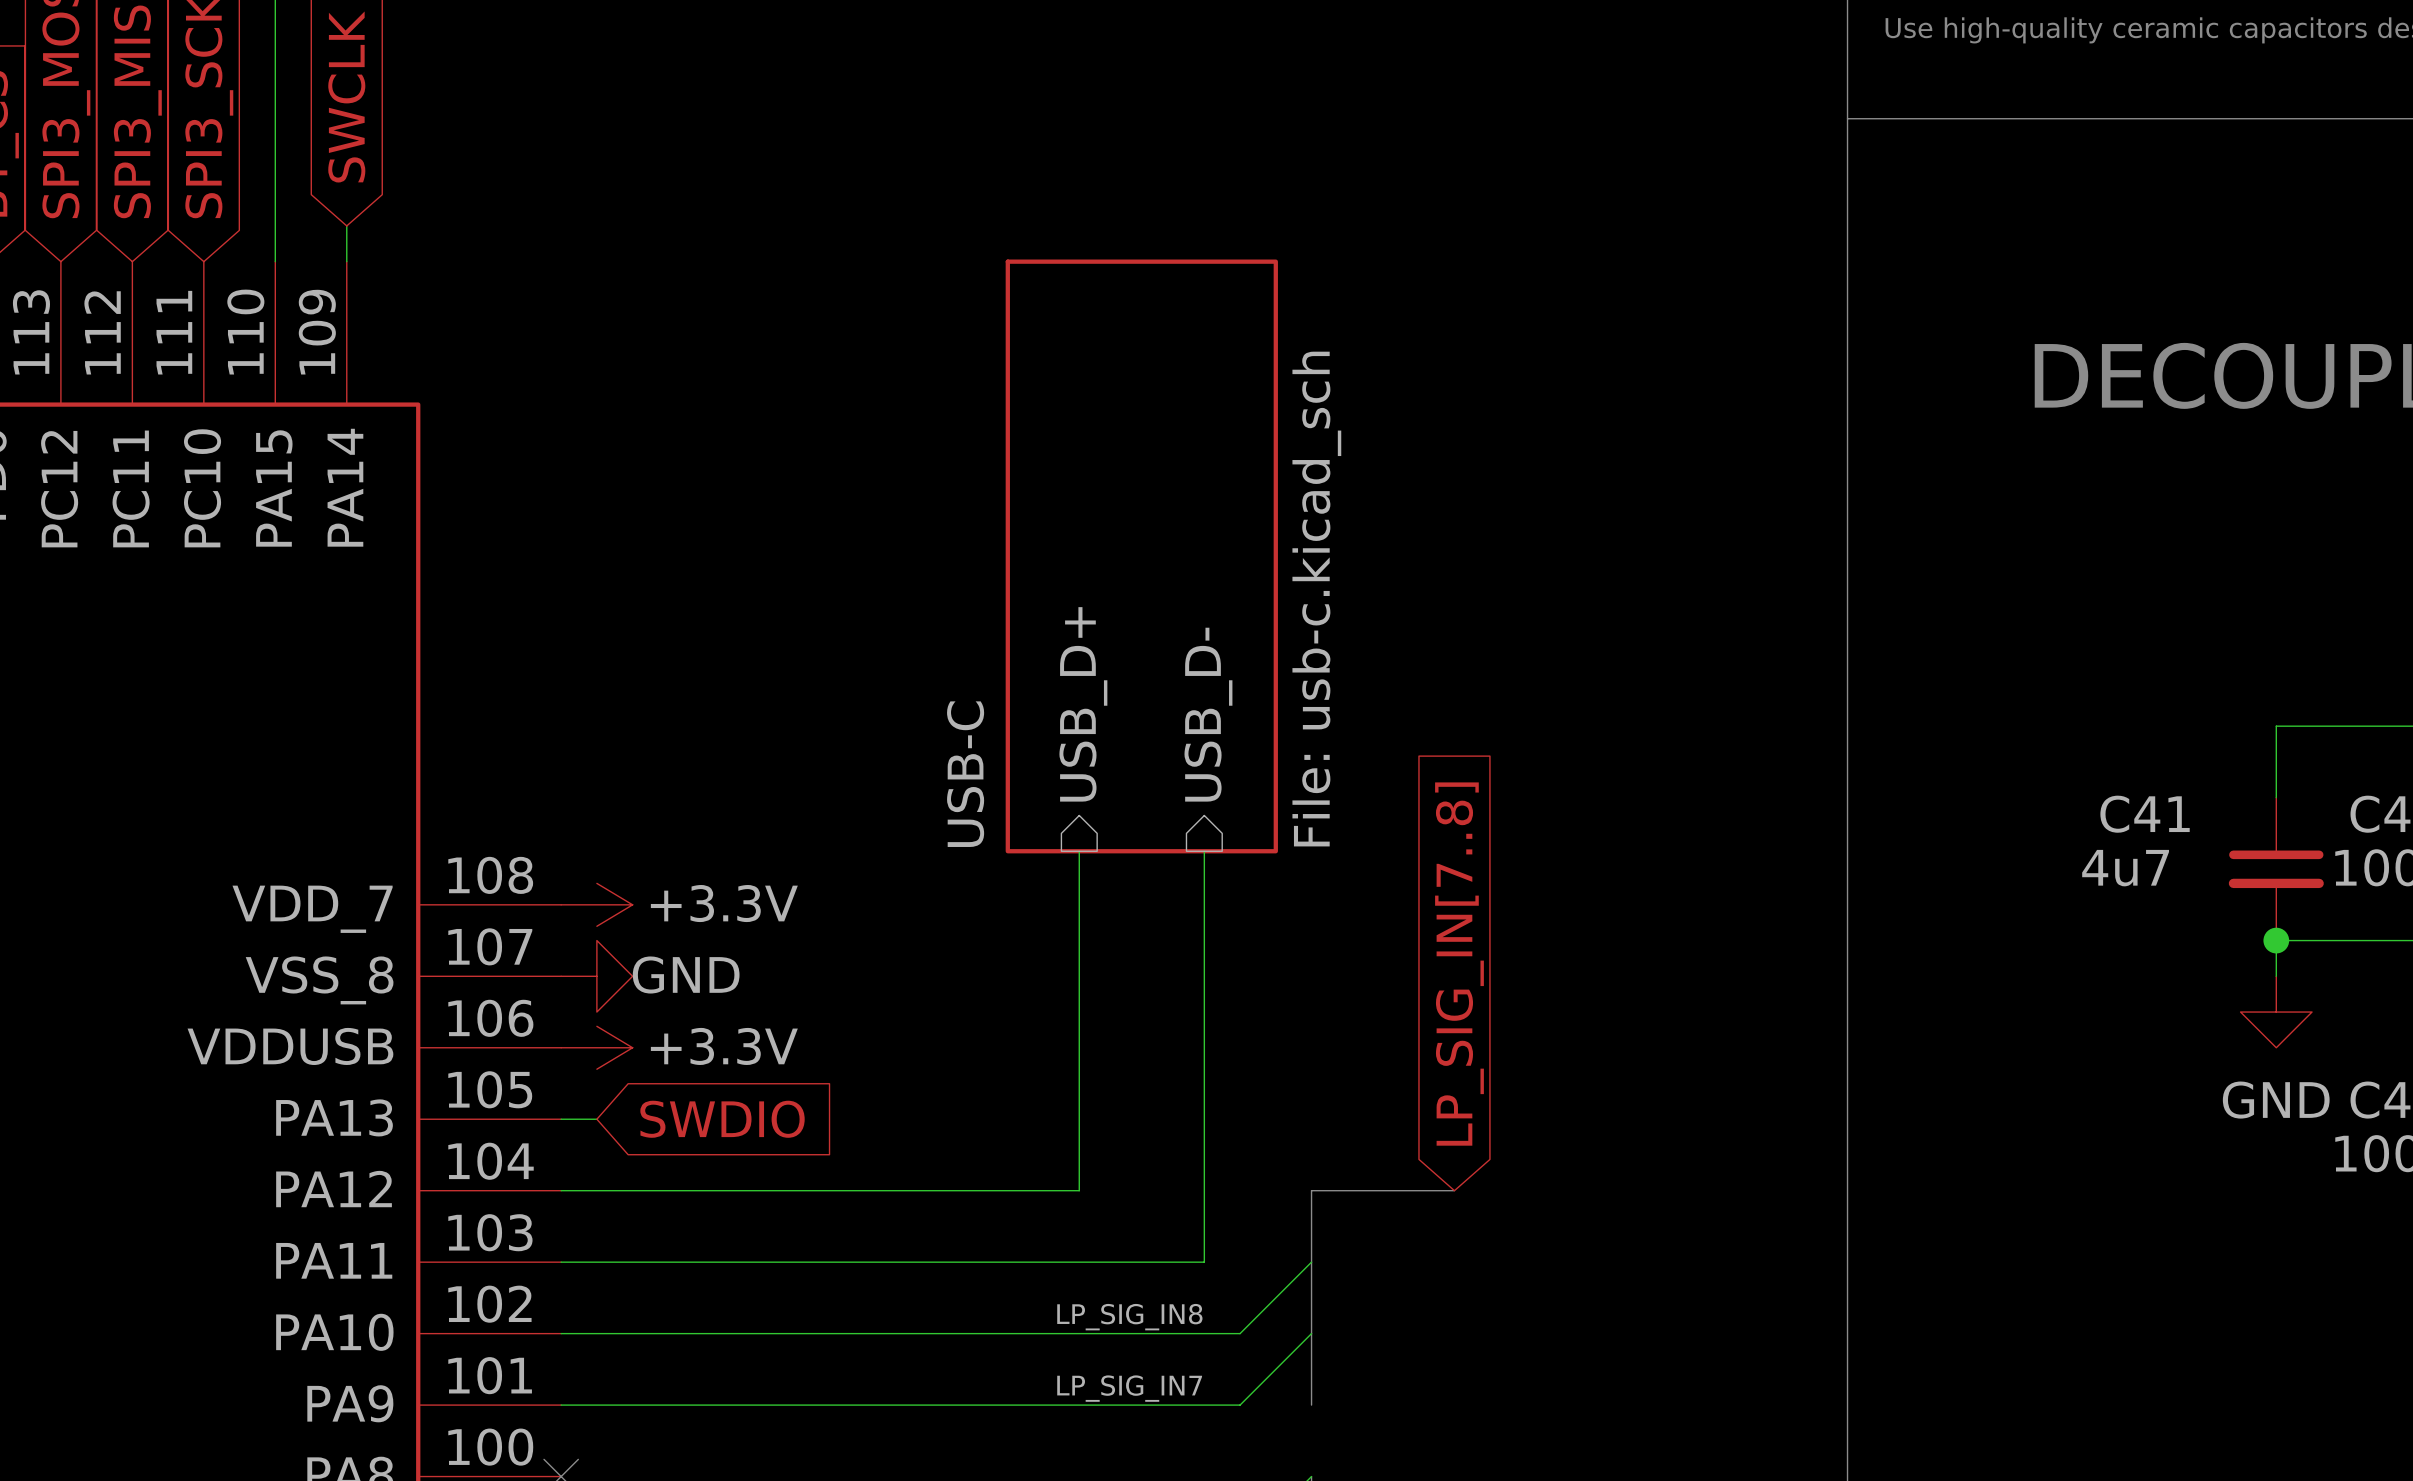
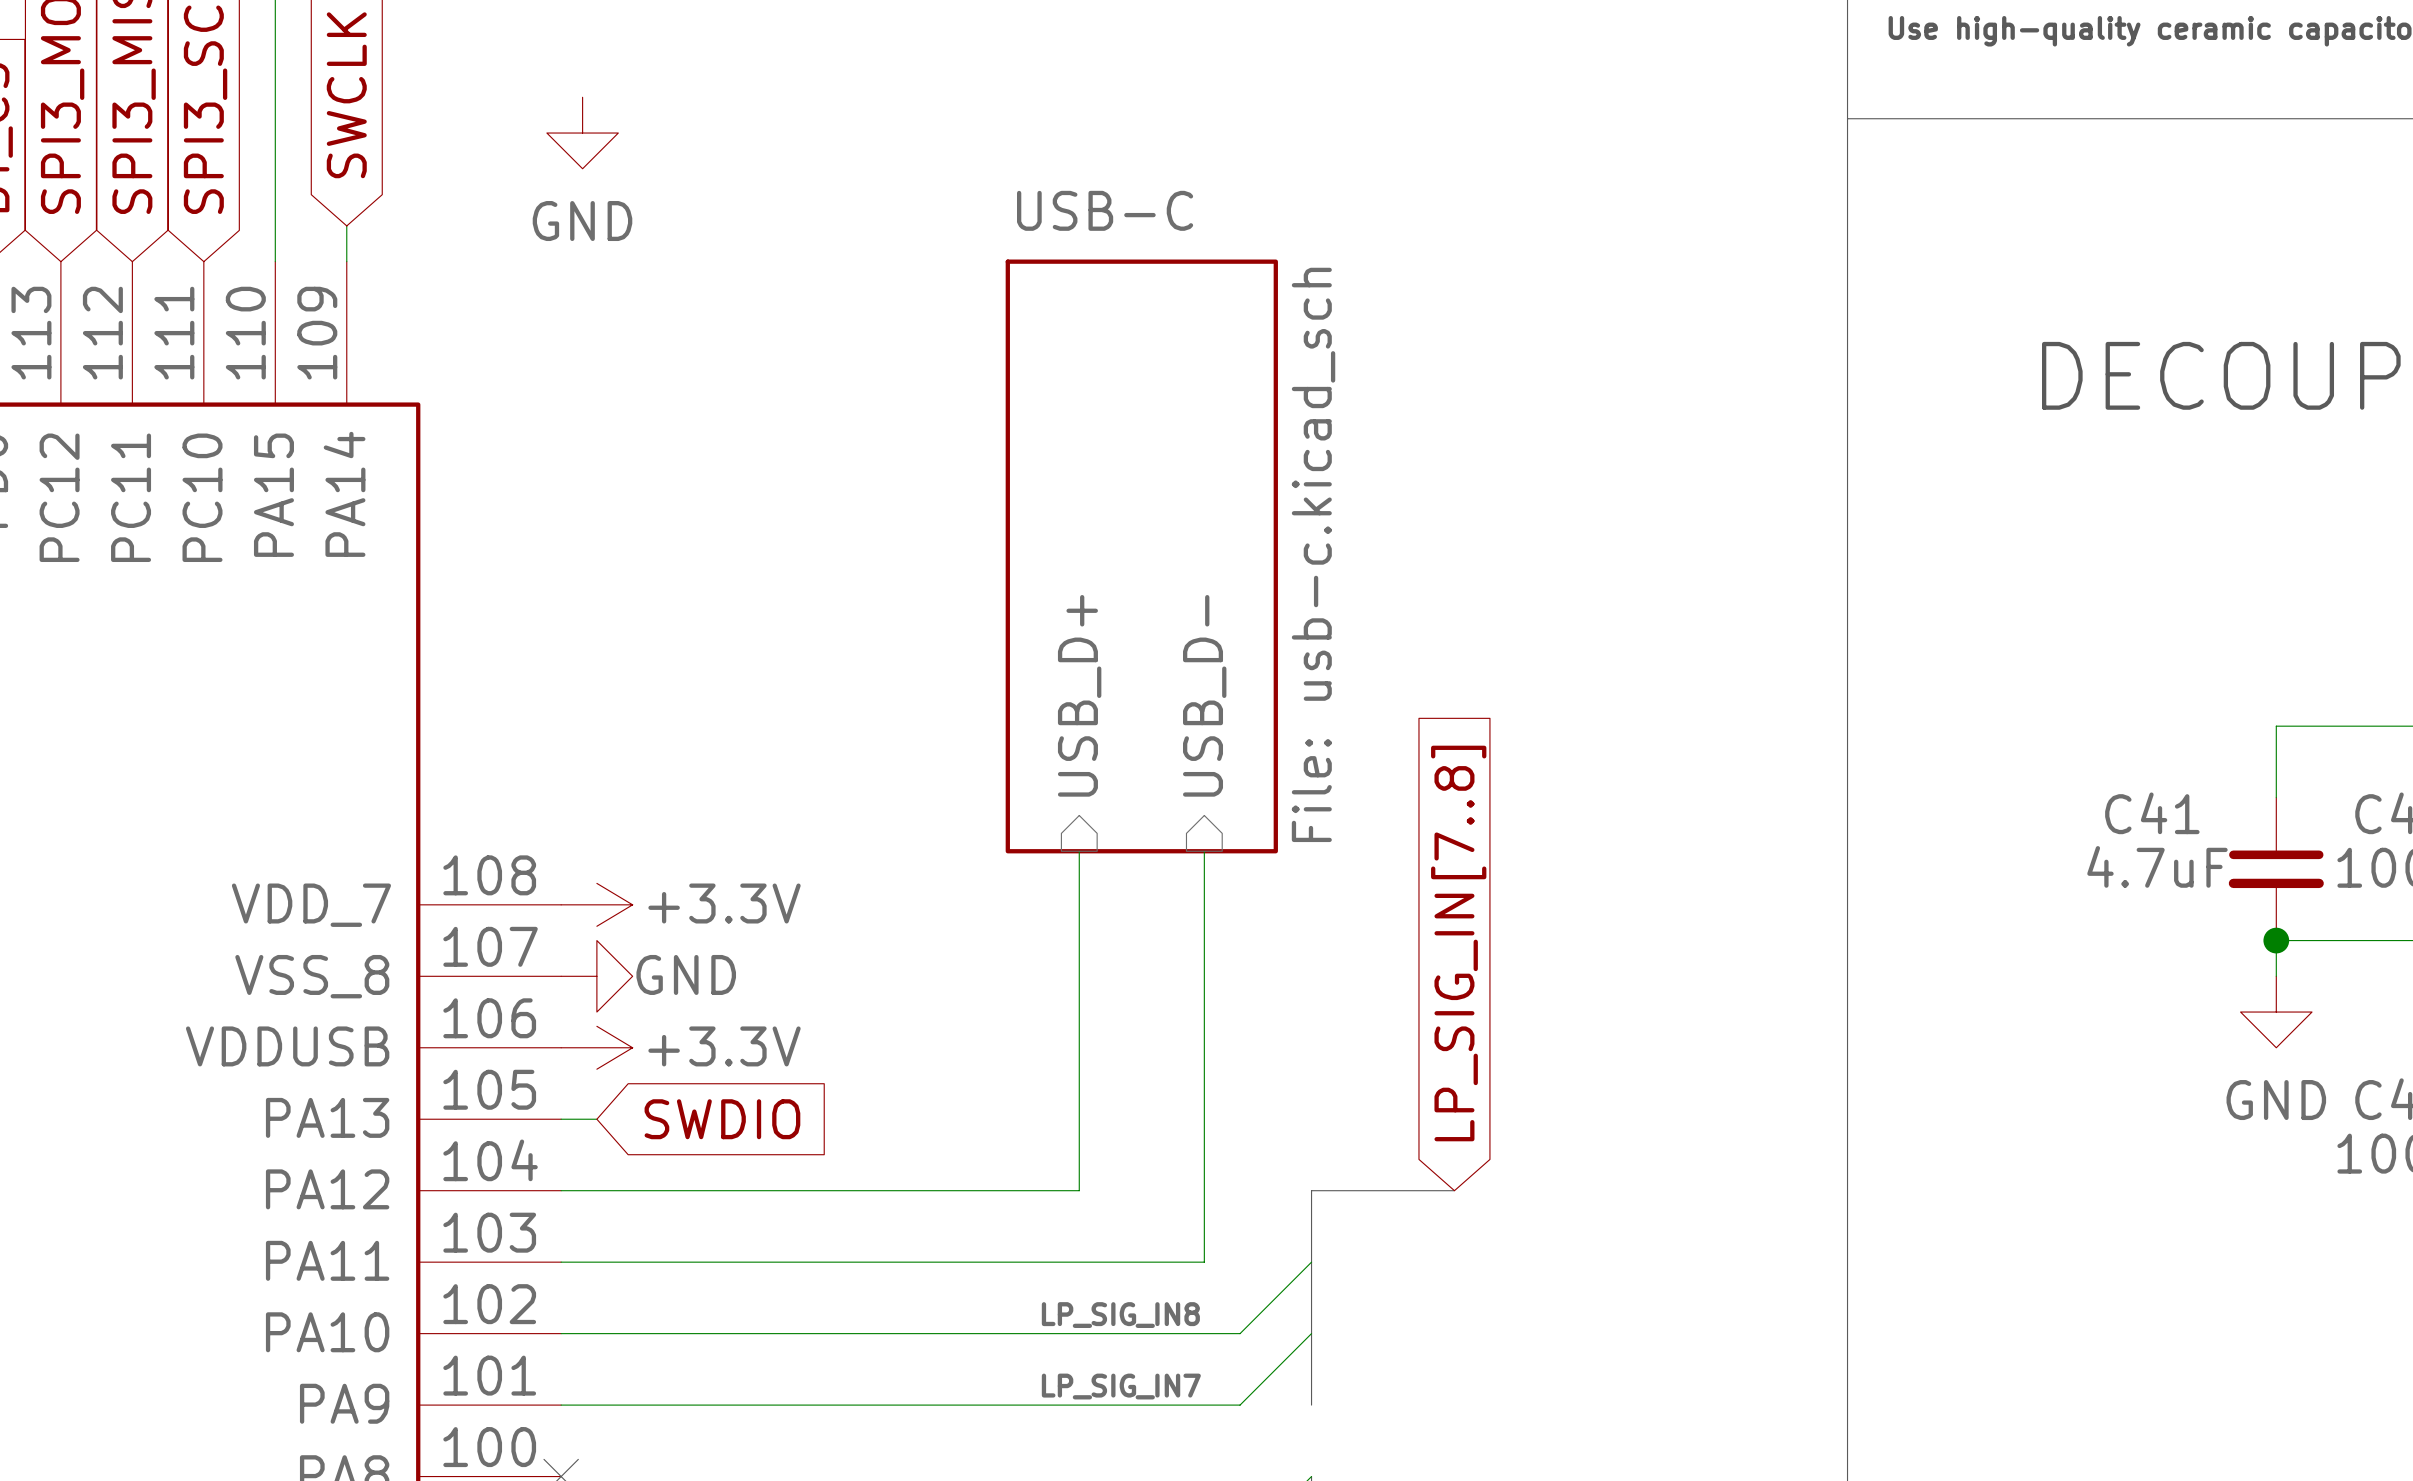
power symbol: none -> GND (582, 133)
sheet USB-C name rotation: 0° (965, 774) -> 90° clockwise (1105, 210)
sheet USB-C name position: USB-C (965, 774) -> USB-C (1105, 210)
C41 value: 4u7 (2125, 868) -> 4.7uF (2157, 866)

